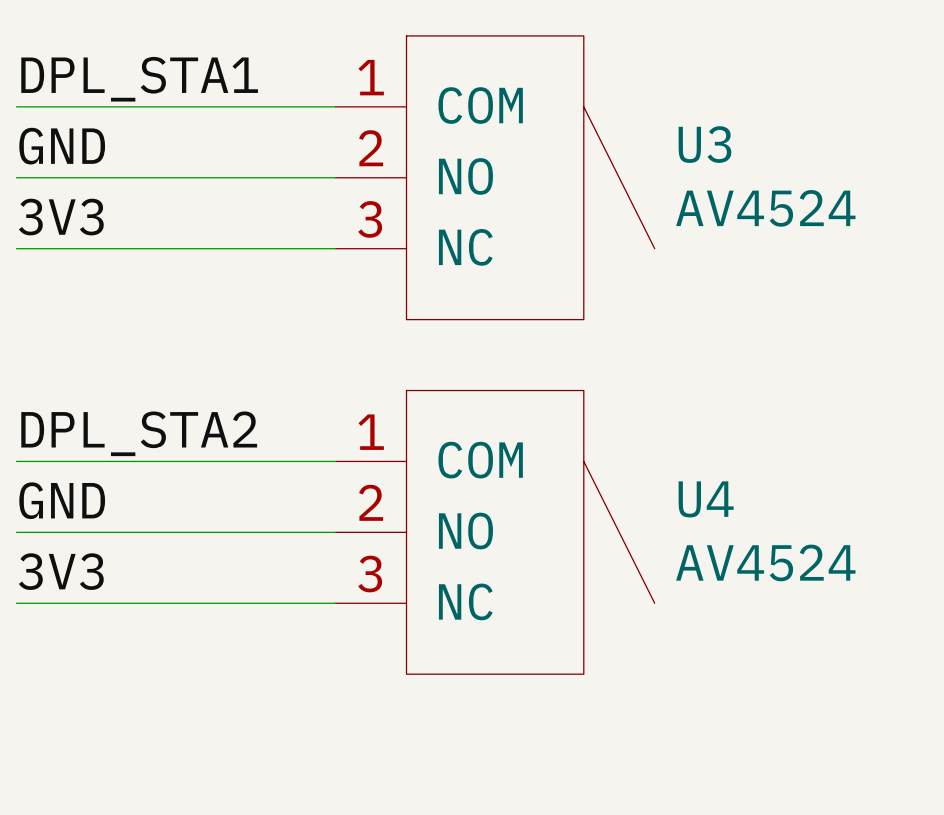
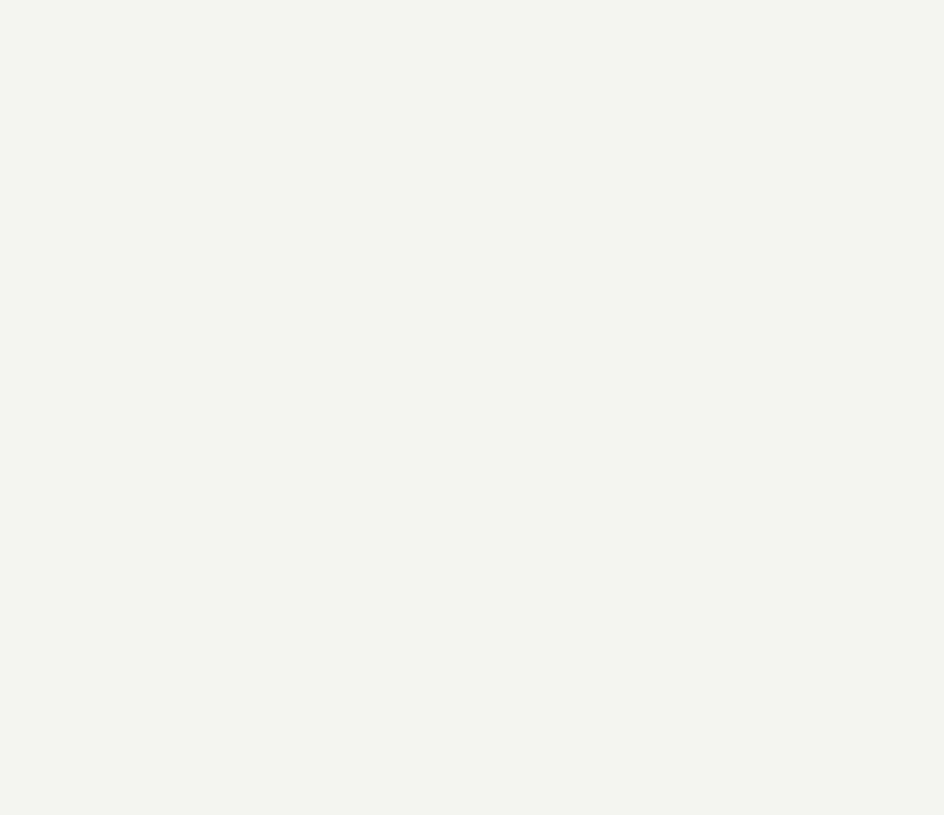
label: DPL_STA1 (139, 79) -> none
wire: (16, 106) (335, 106) -> none
label: GND (62, 146) -> none
wire: (16, 177) (335, 177) -> none
U3: AV4524 (495, 177) -> none
label: 3V3 (61, 217) -> none
wire: (16, 248) (335, 248) -> none
label: DPL_STA2 (139, 433) -> none
wire: (16, 461) (335, 461) -> none
label: GND (62, 500) -> none
wire: (16, 532) (335, 532) -> none
U4: AV4524 (495, 532) -> none
label: 3V3 (61, 571) -> none
wire: (16, 603) (335, 603) -> none

